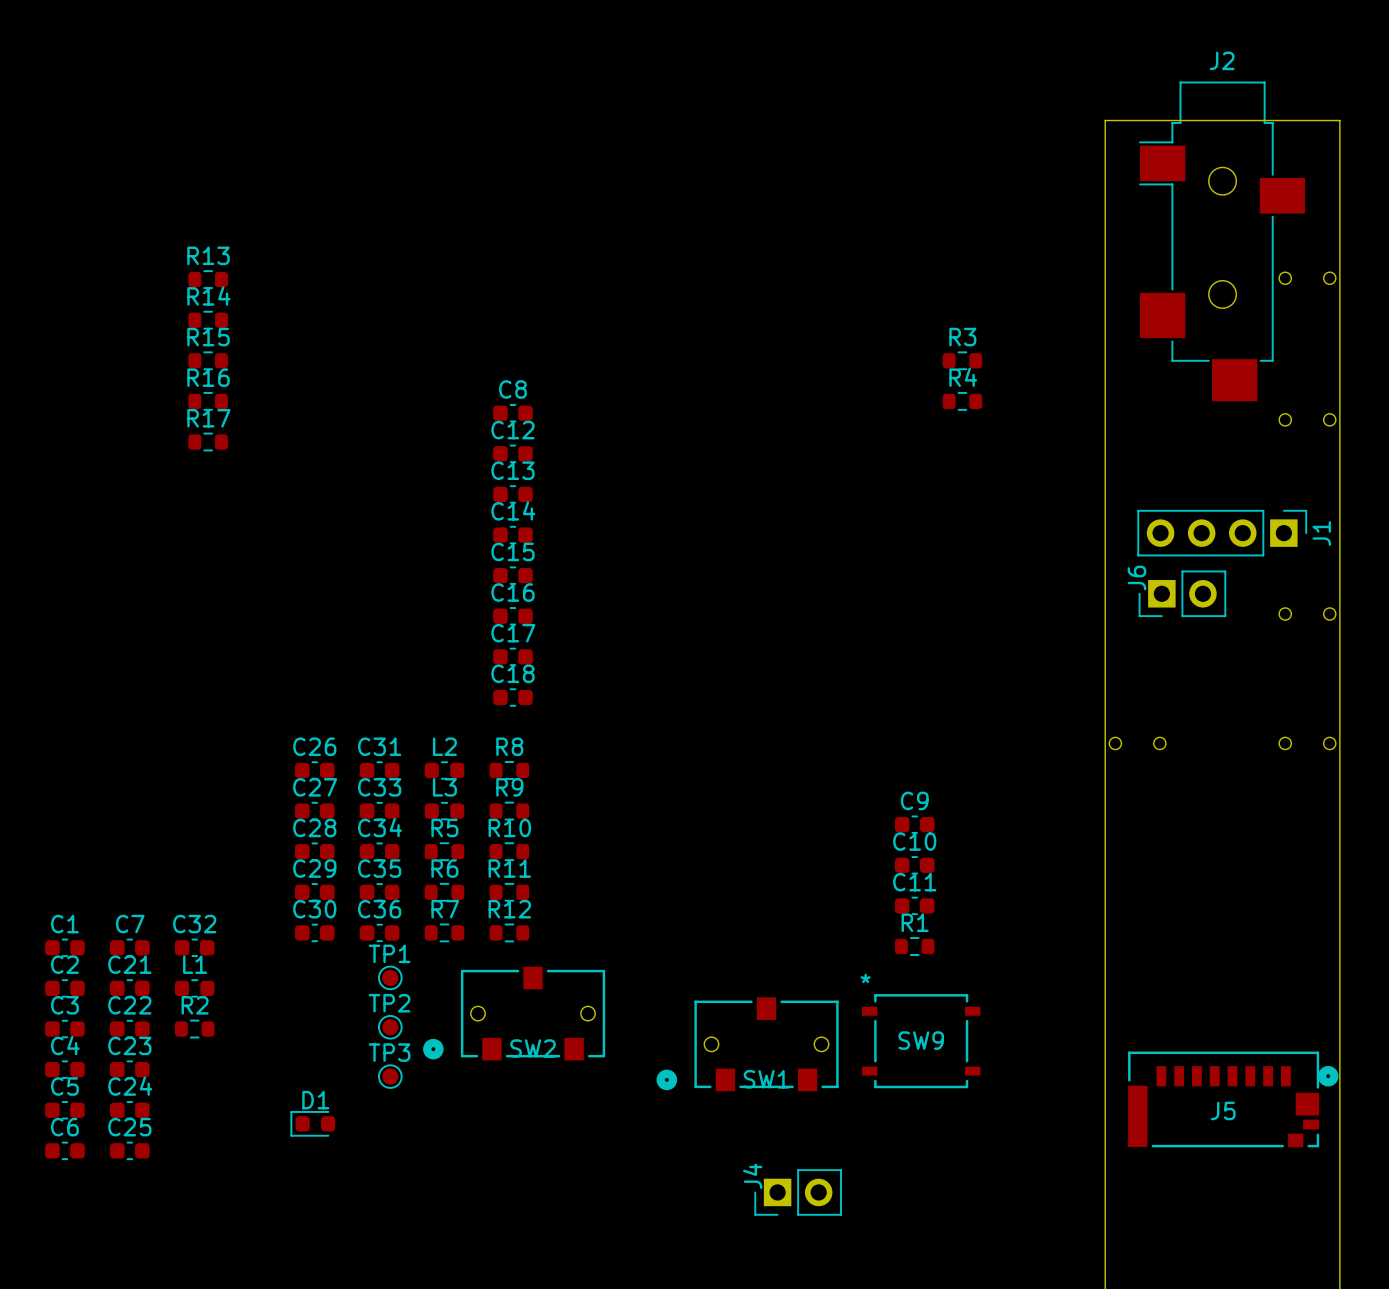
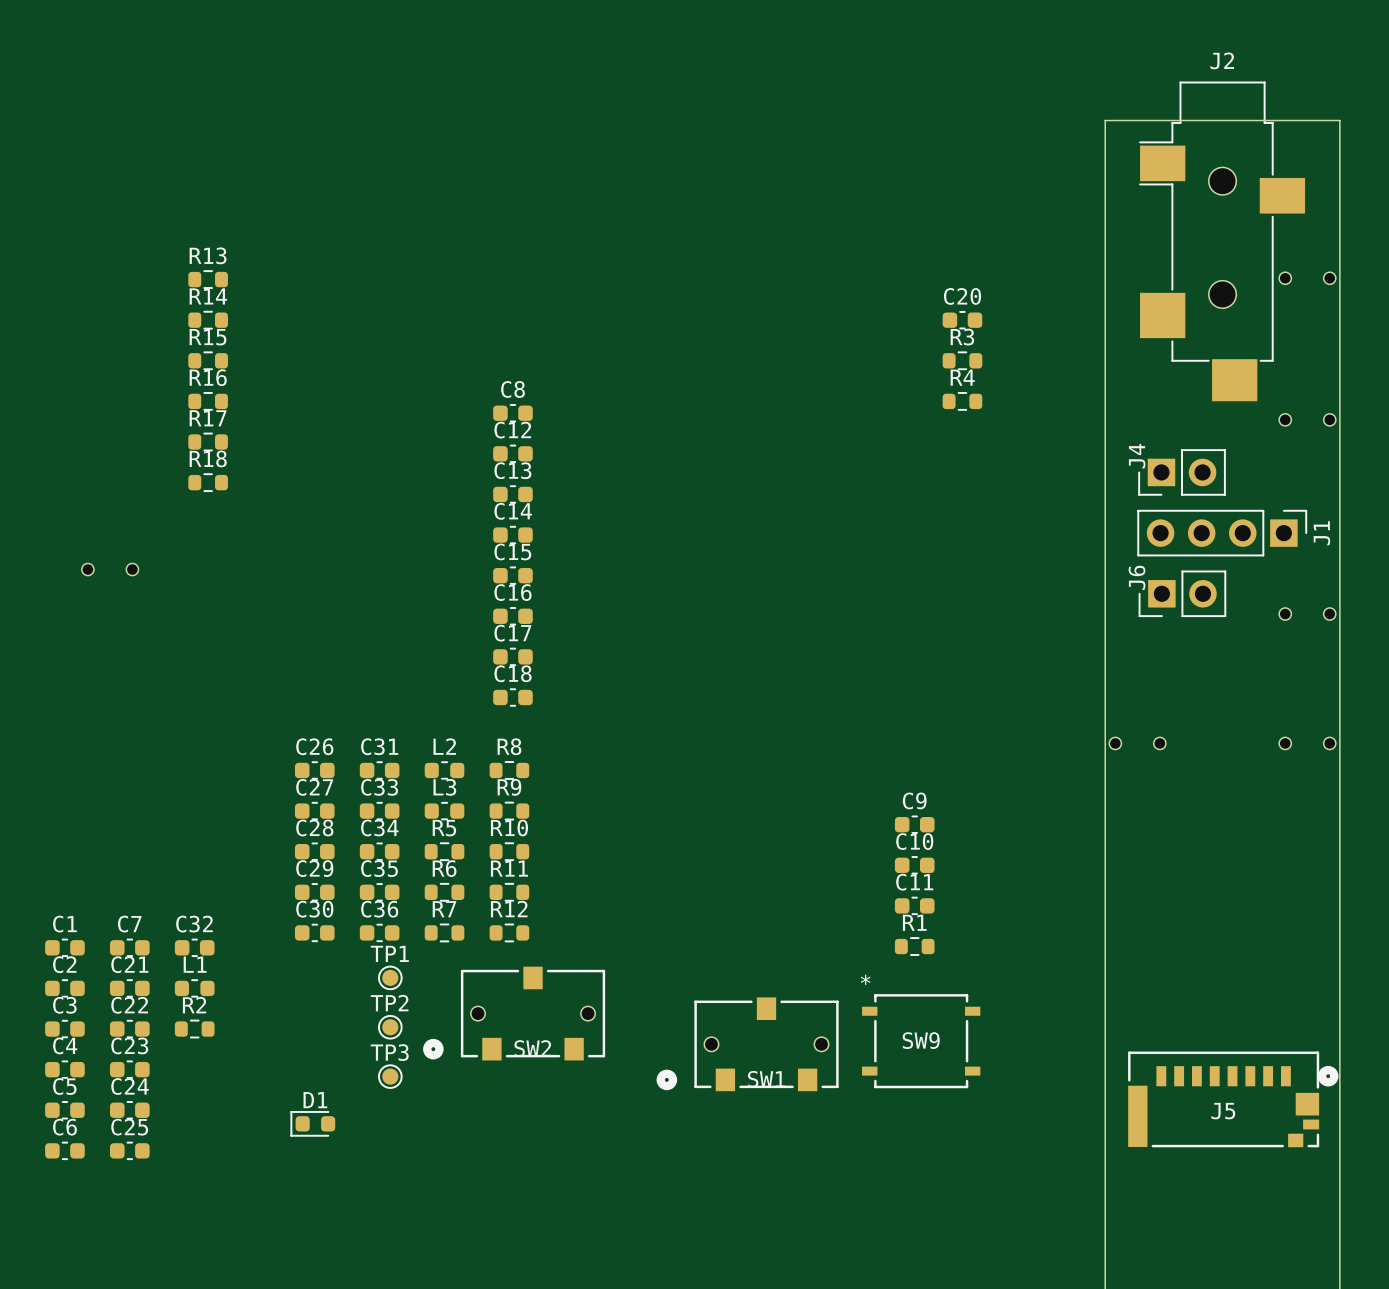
C20: none -> (962, 320)
R18: none -> (208, 482)
part: none -> (110, 569)
J4 position: (798, 1192) -> (1182, 472)

